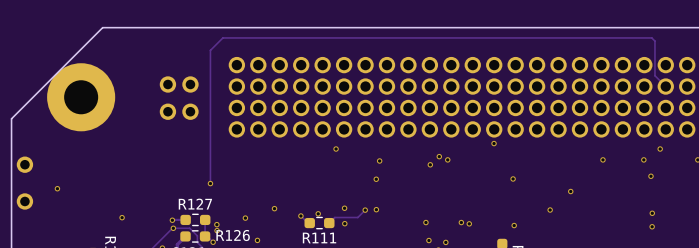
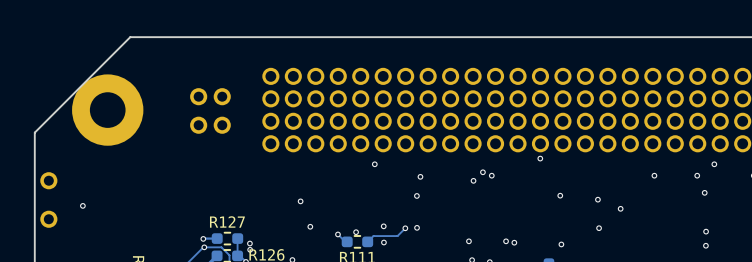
track: (665, 86) (654, 75) (654, 41) (651, 37) (222, 37) (210, 50) (210, 183) -> none
via: none -> (597, 199)
via: (210, 183) -> none
via: none -> (300, 201)
via: (122, 217) -> none
via: (245, 218) -> none

